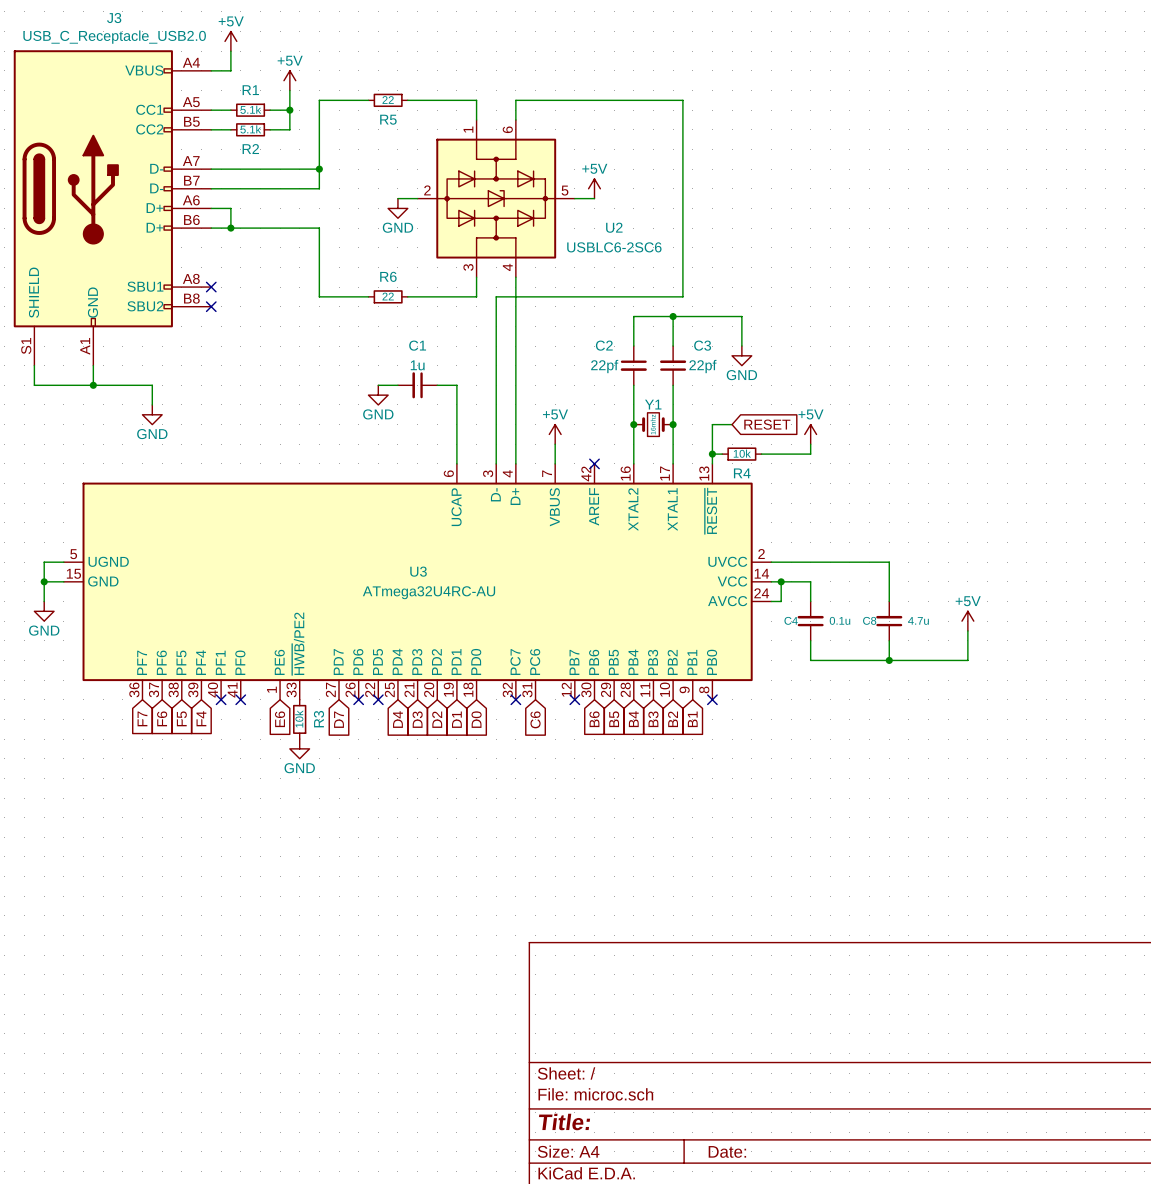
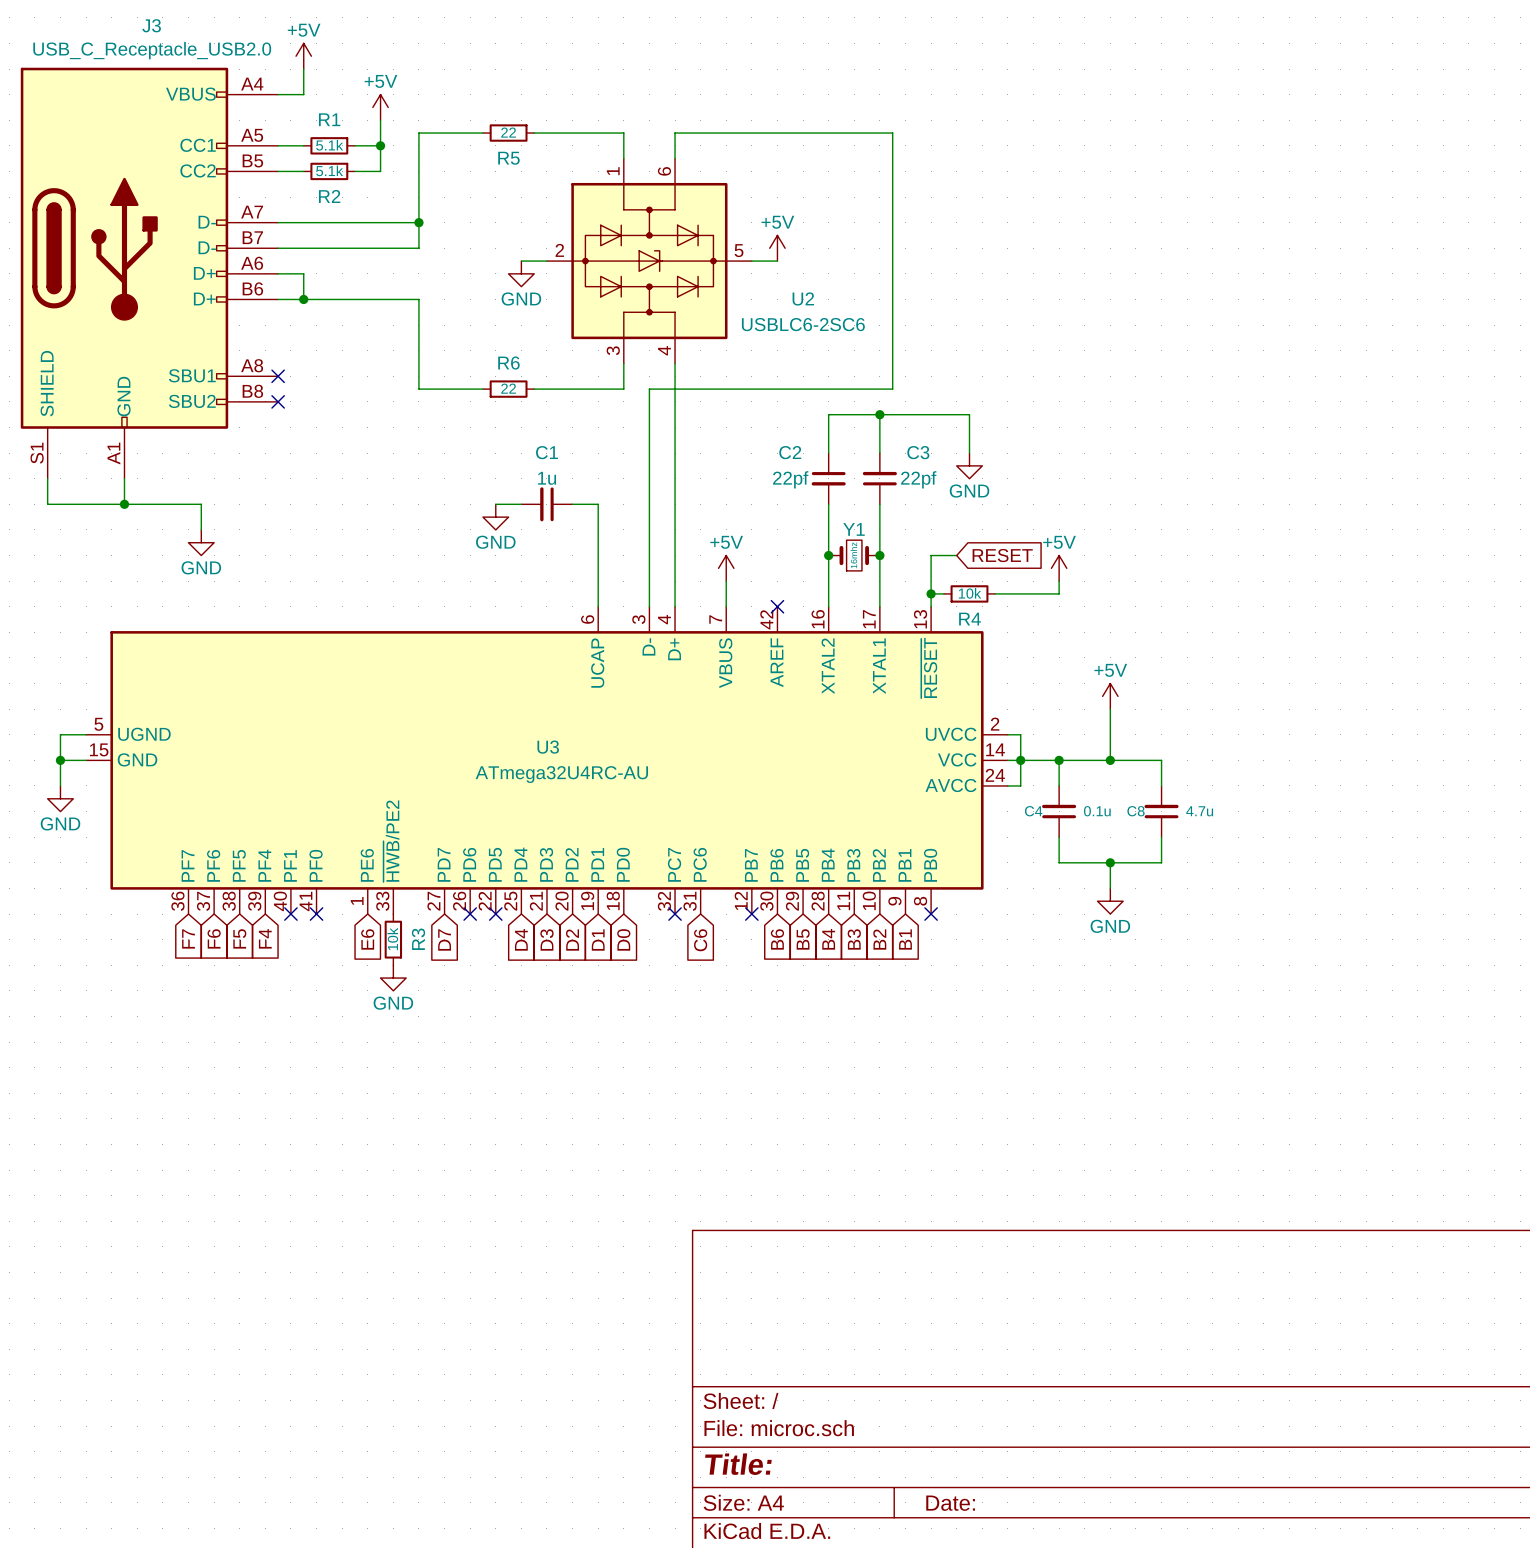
wire: none -> (1110, 709) (1110, 760)
wire: (781, 562) (889, 562) (889, 581) -> (1059, 760) (1161, 760)
wire: none -> (1020, 734) (1020, 760)
junction: none -> (1059, 760)
junction: none -> (1110, 760)
power symbol position: +5V (967, 621) -> +5V (1110, 696)
wire: (967, 630) (967, 660) (889, 660) -> none
wire: none -> (1110, 862) (1110, 888)
junction position: (889, 660) -> (1110, 862)
power symbol: none -> GND (1110, 901)

